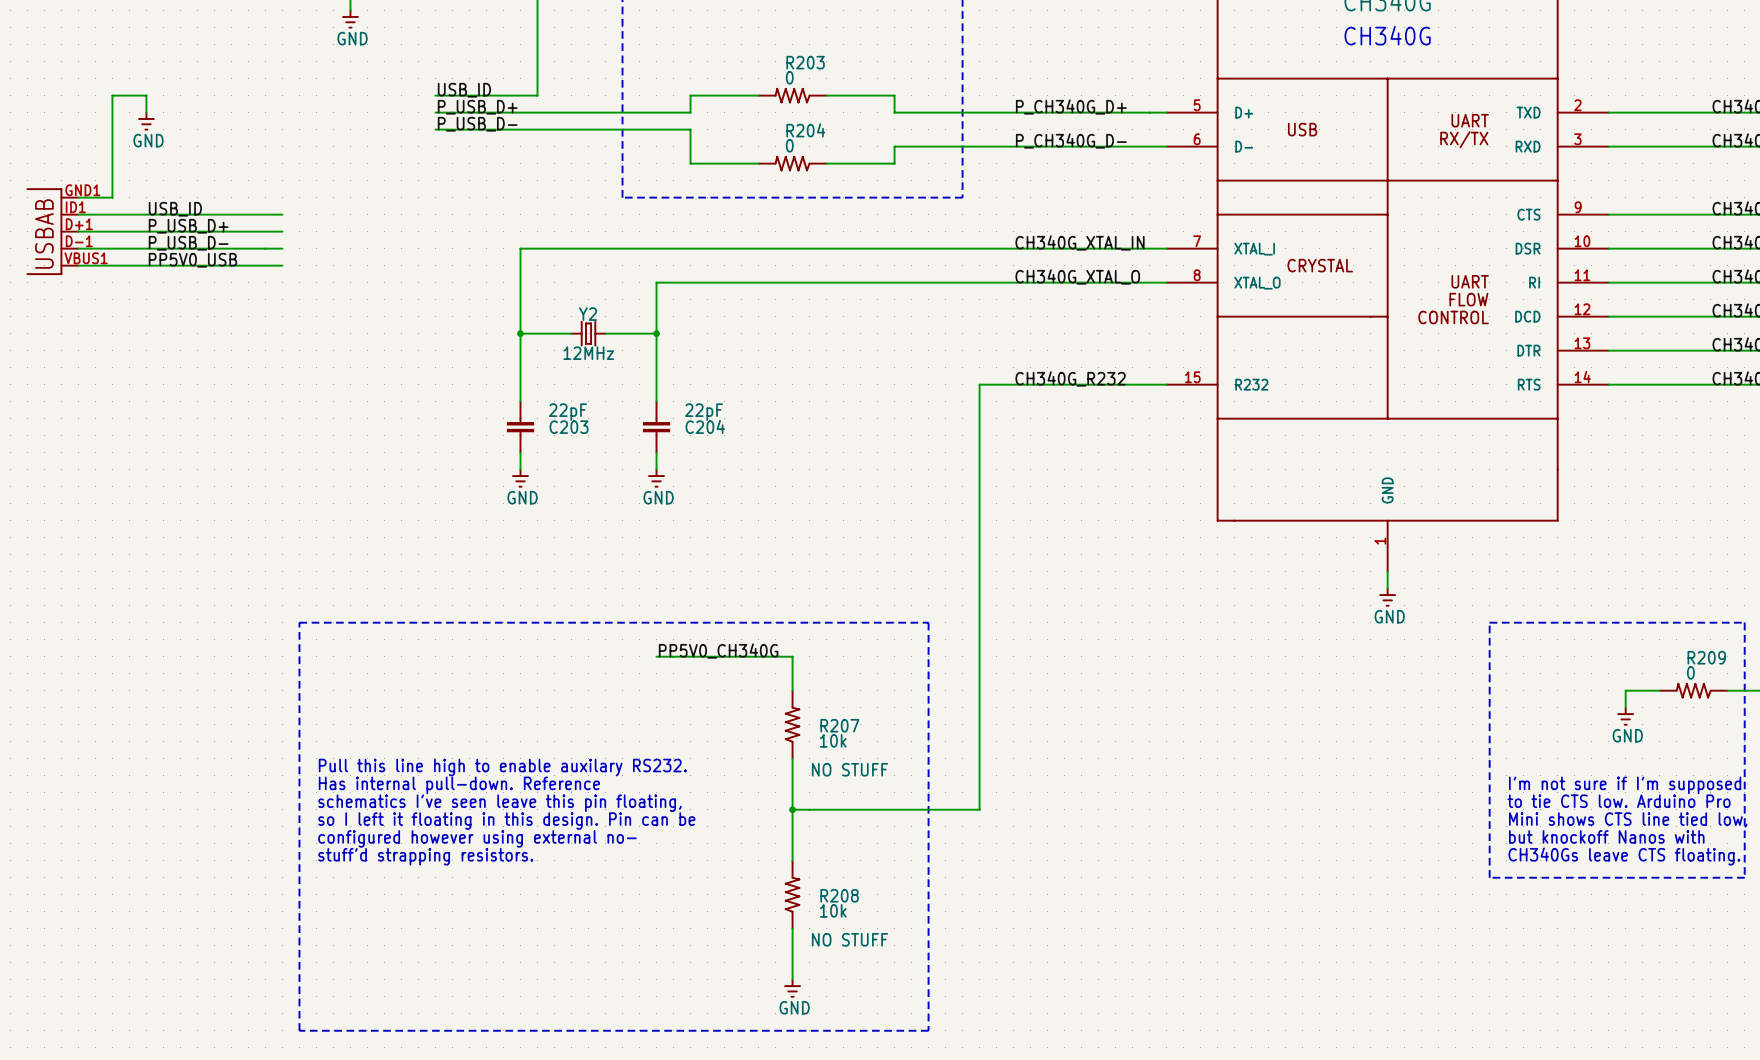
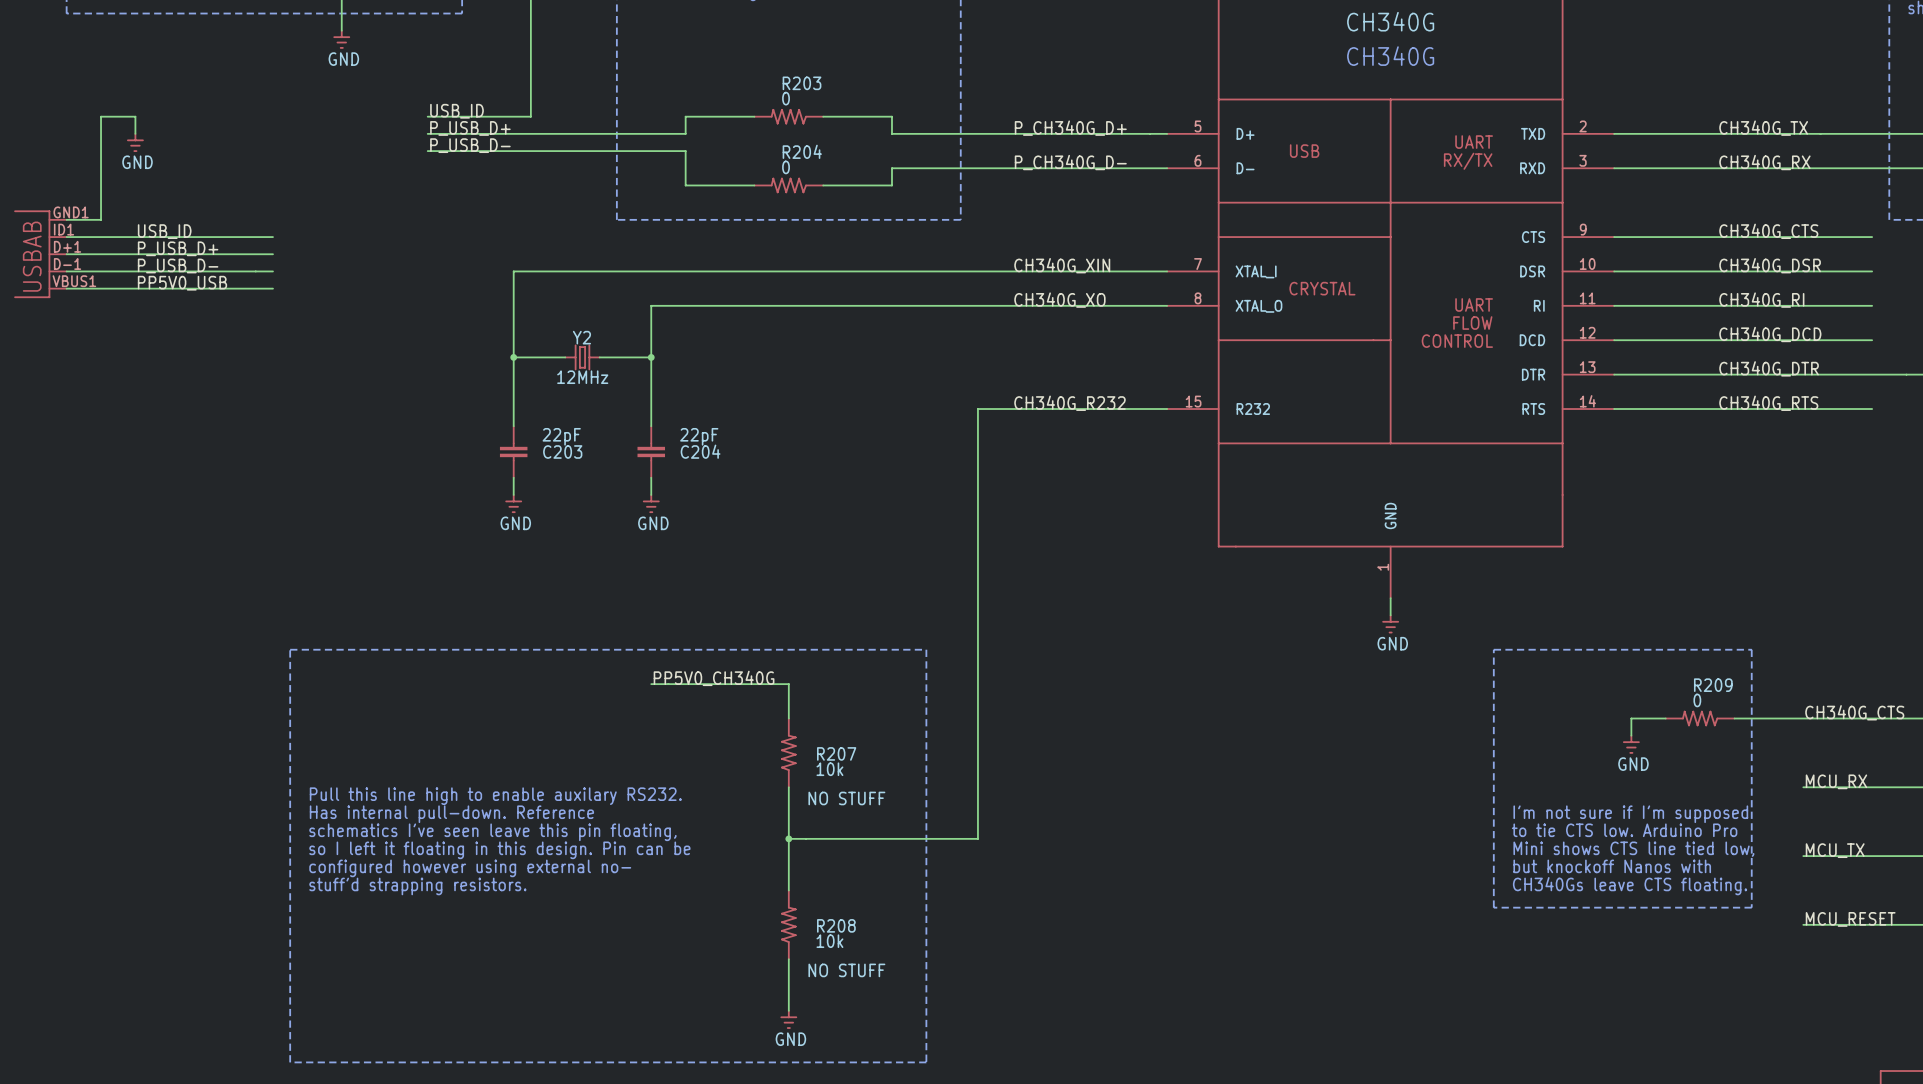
label: CH340G_XTAL_IN (1080, 242) -> CH340G_XIN (1062, 265)
label: CH340G_XTAL_O (1077, 276) -> CH340G_XO (1059, 300)

